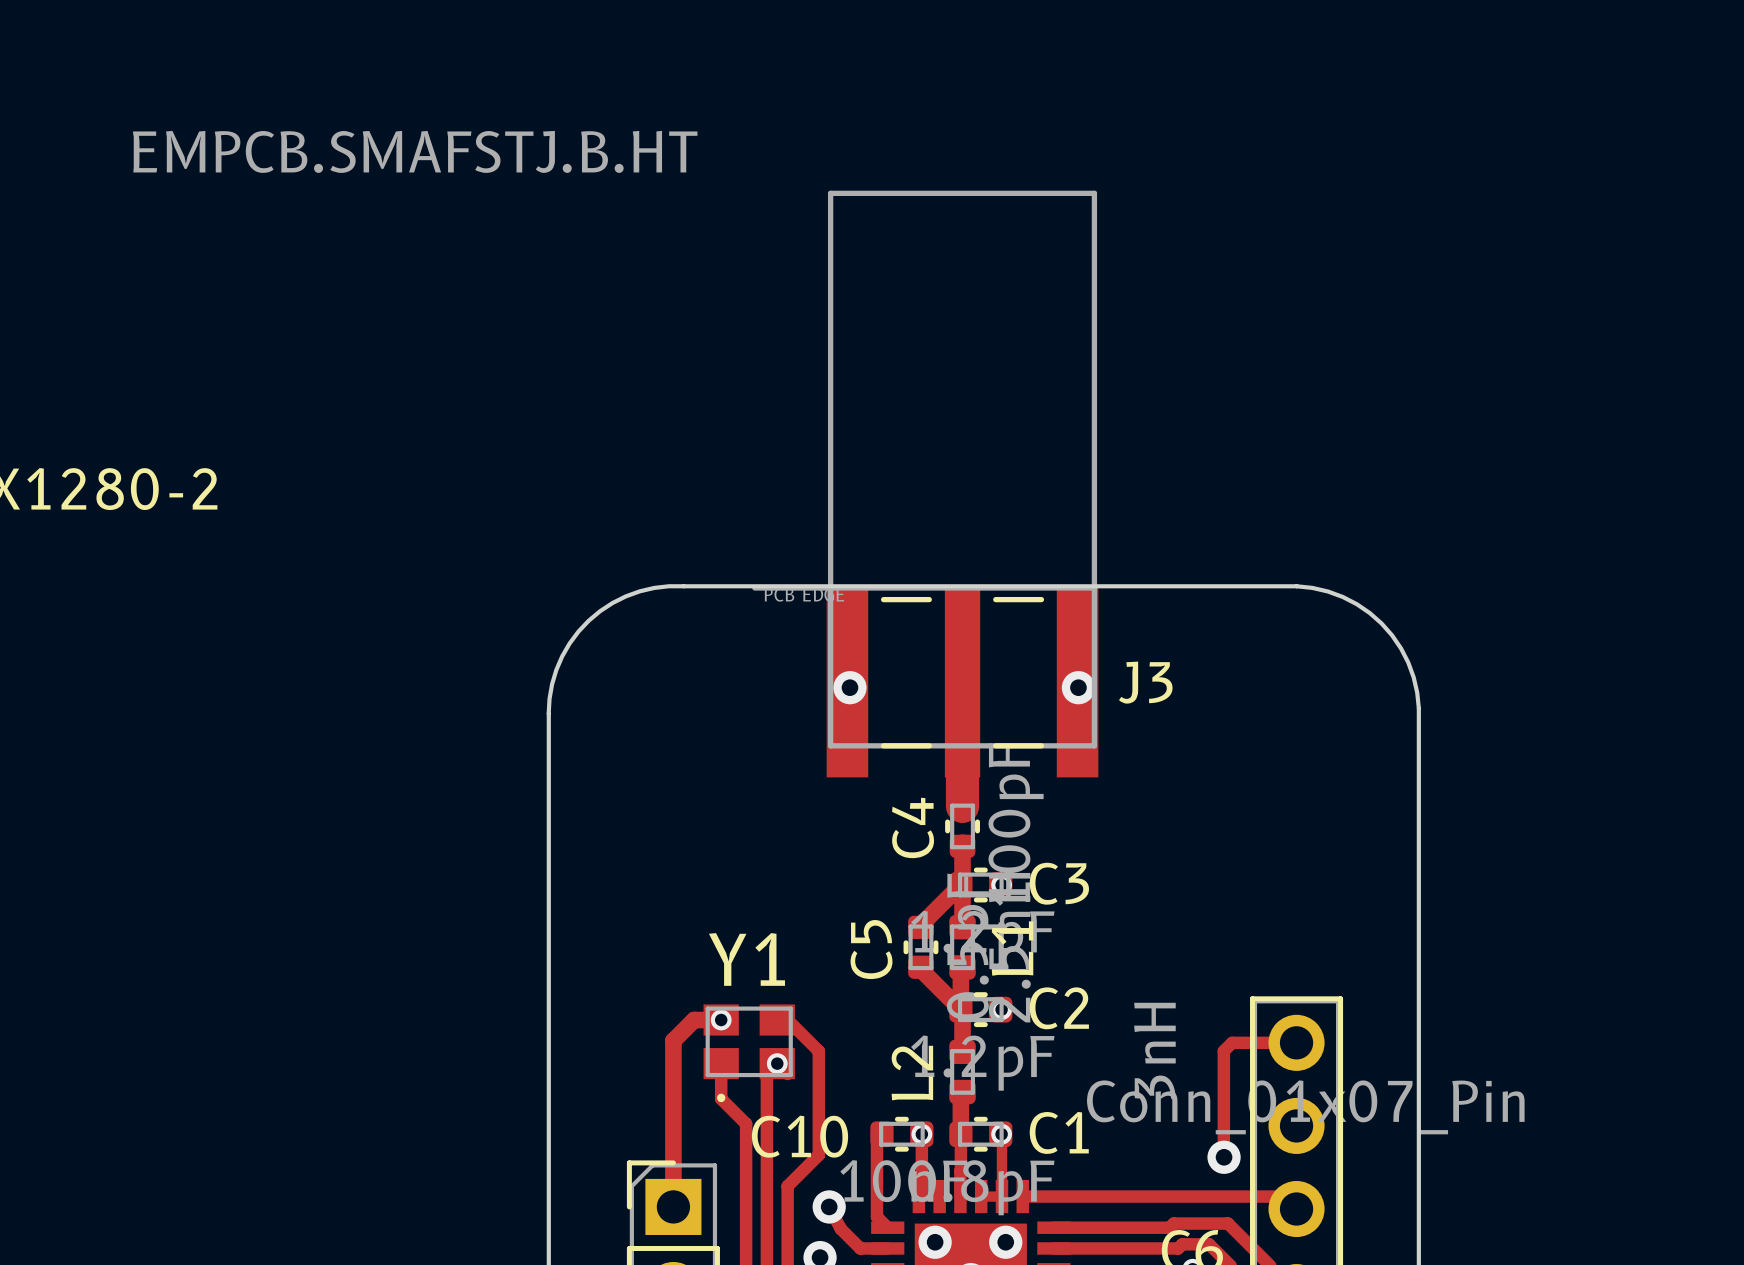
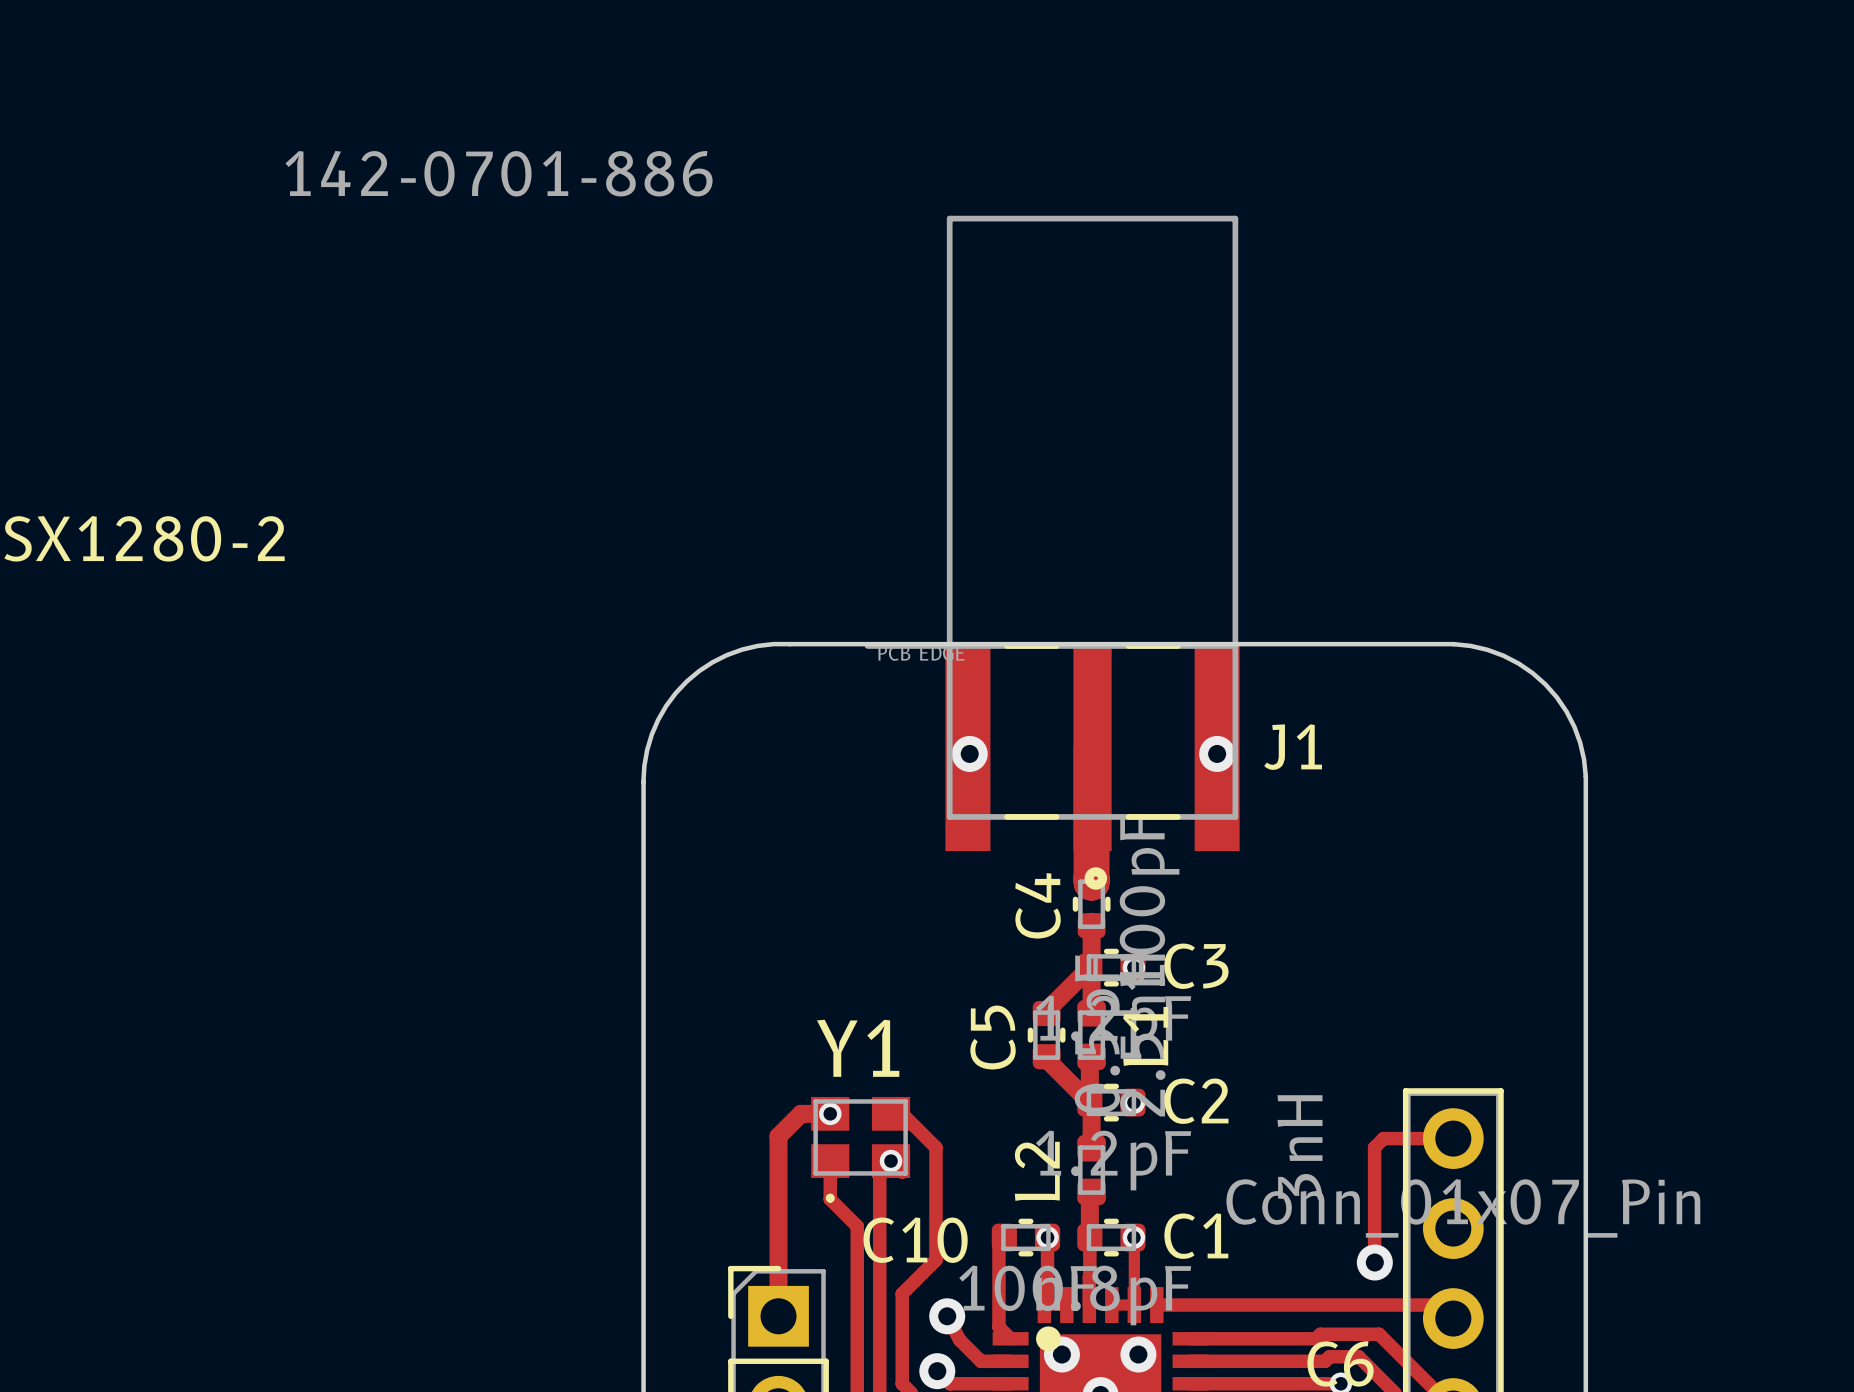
J3: EMPCB.SMAFSTJ.B.HT (925, 484) -> none
J1: none -> 142-0701-886 (1052, 552)
drawing: none -> [1036, 1326, 1061, 1352]

